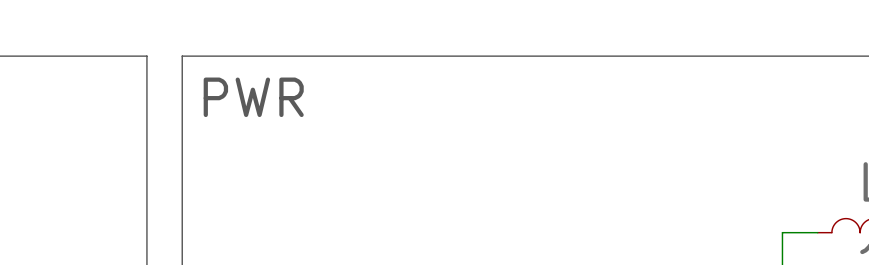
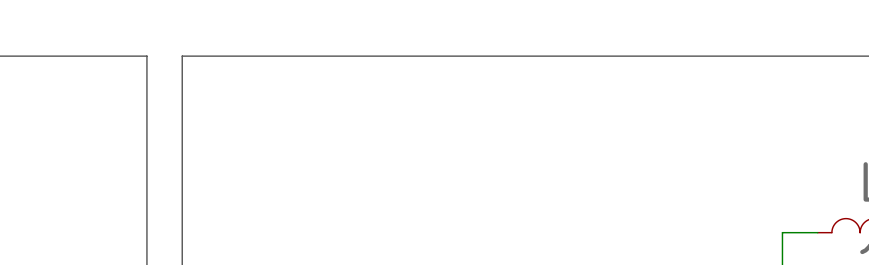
text: PWR (253, 97) -> none

